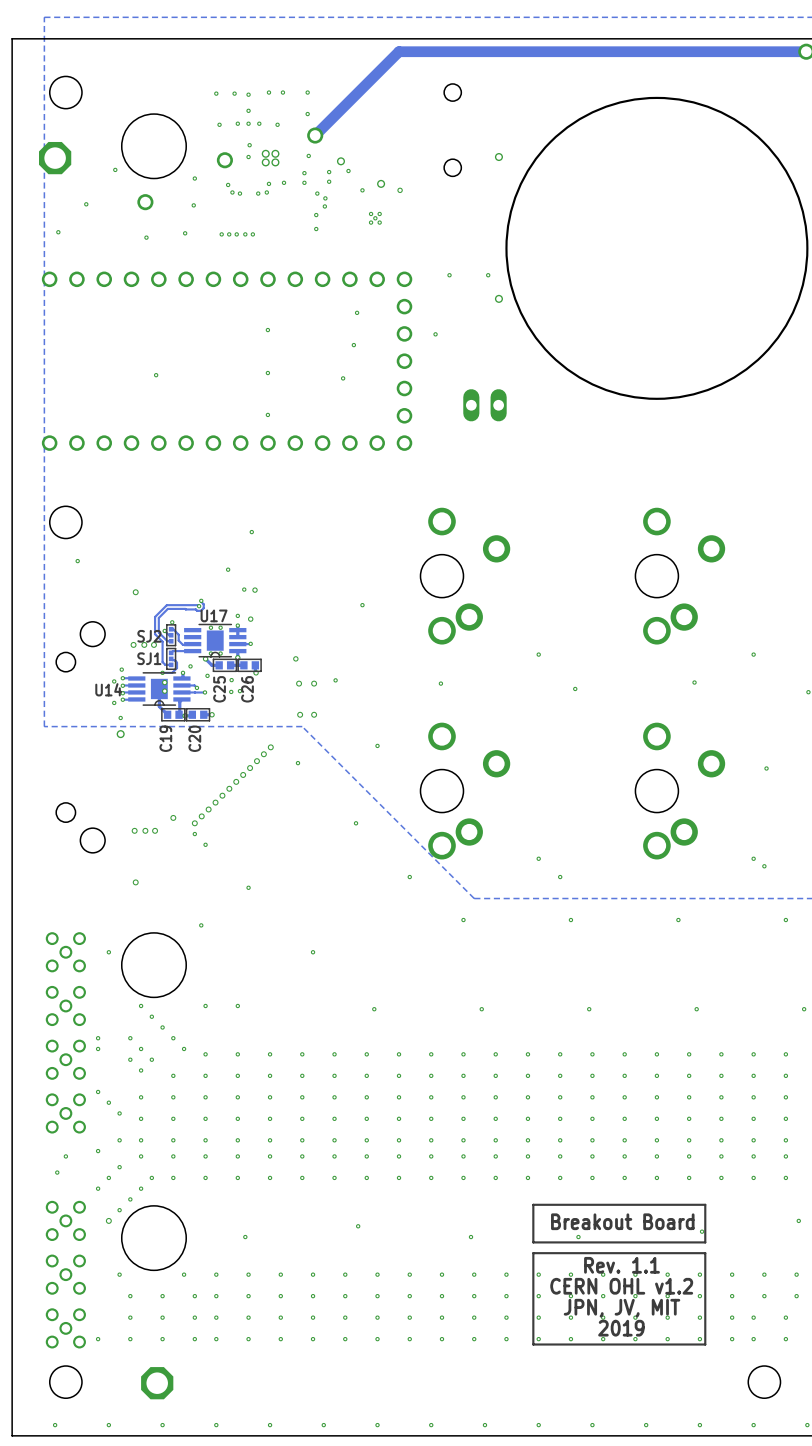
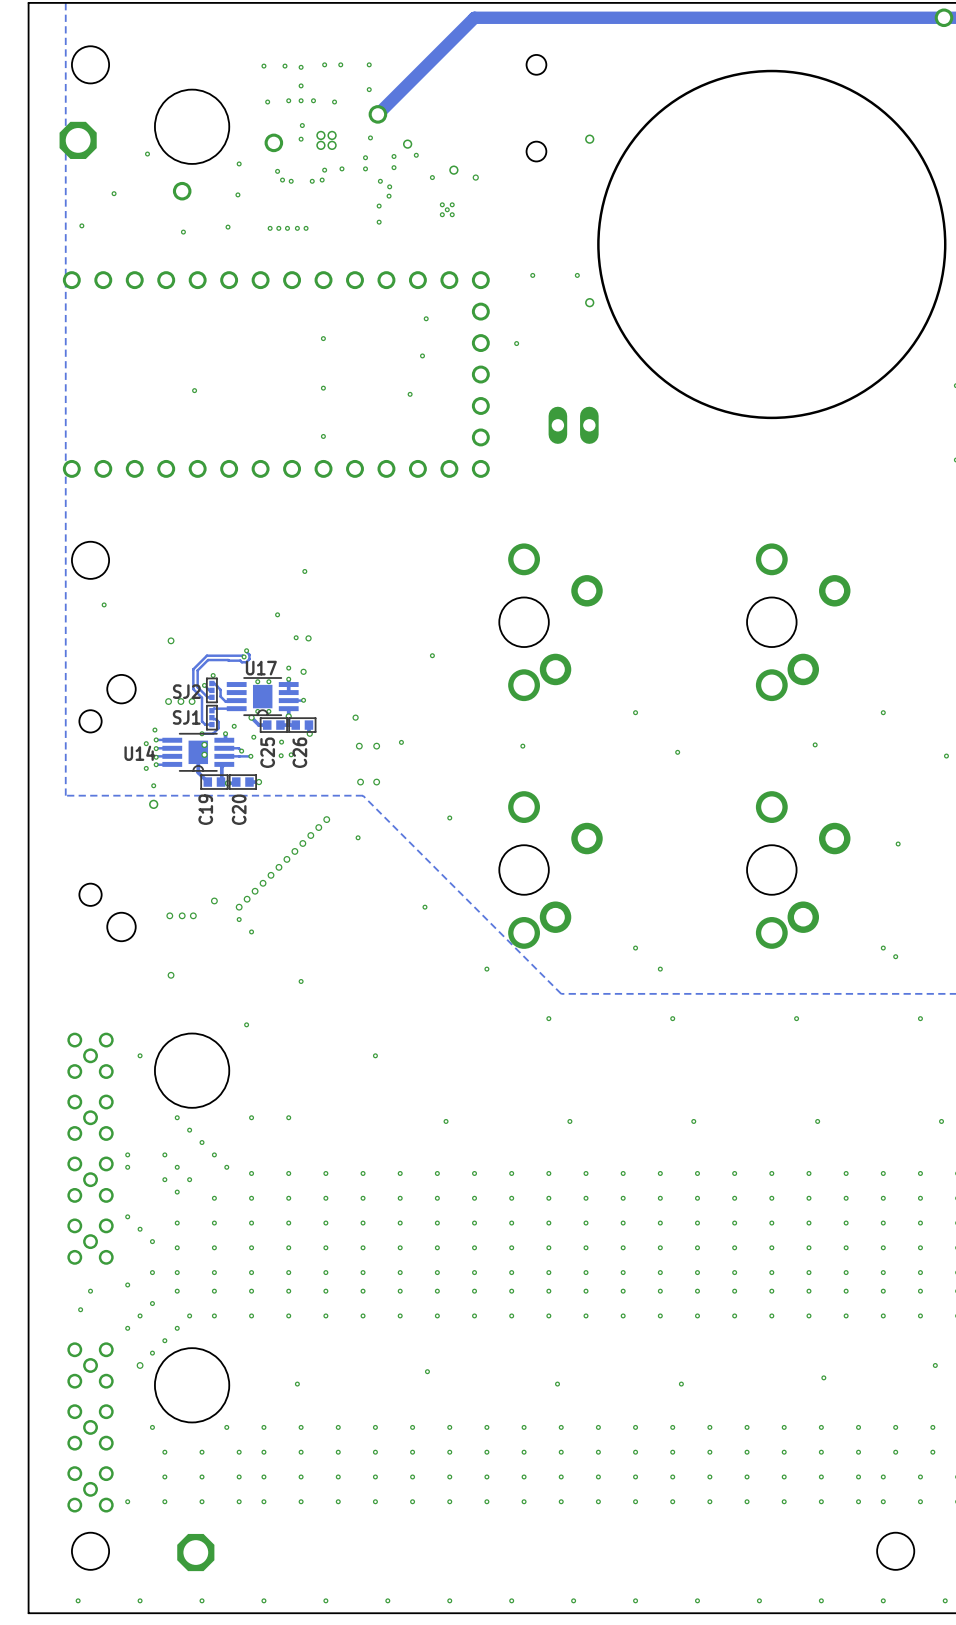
line: (705, 1204) (705, 1242) (533, 1242) (533, 1204) (705, 1204) -> none
text: Breakout Board (622, 1221) -> none
line: (705, 1253) (533, 1253) (533, 1344) (705, 1344) (705, 1253) -> none
text: Rev. 1.1 (622, 1265) -> none
text: CERN OHL v1.2 (621, 1286) -> none
text: JPN, JV, MIT (622, 1308) -> none
text: 2019 (621, 1328) -> none

